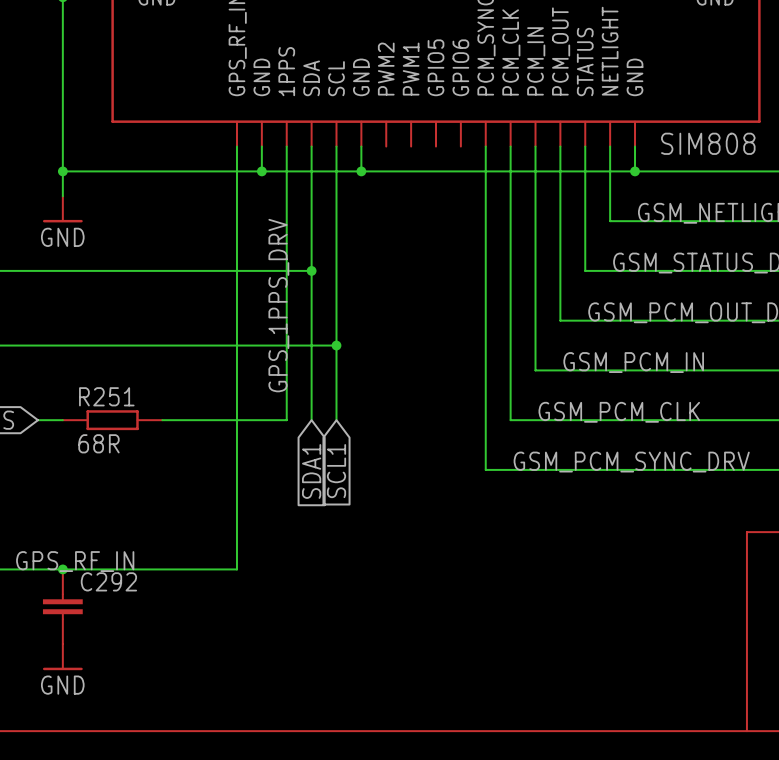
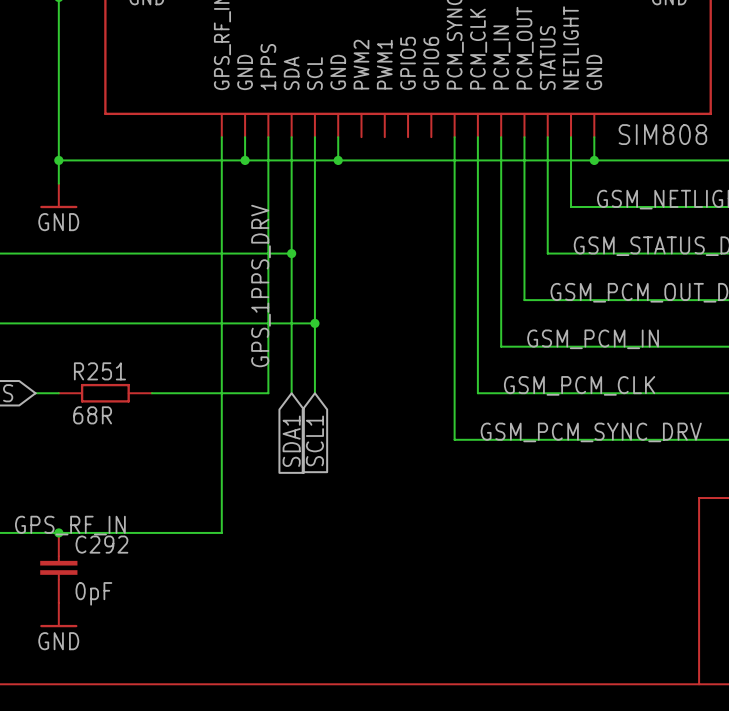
C292 value: none -> 0pF (93, 593)

